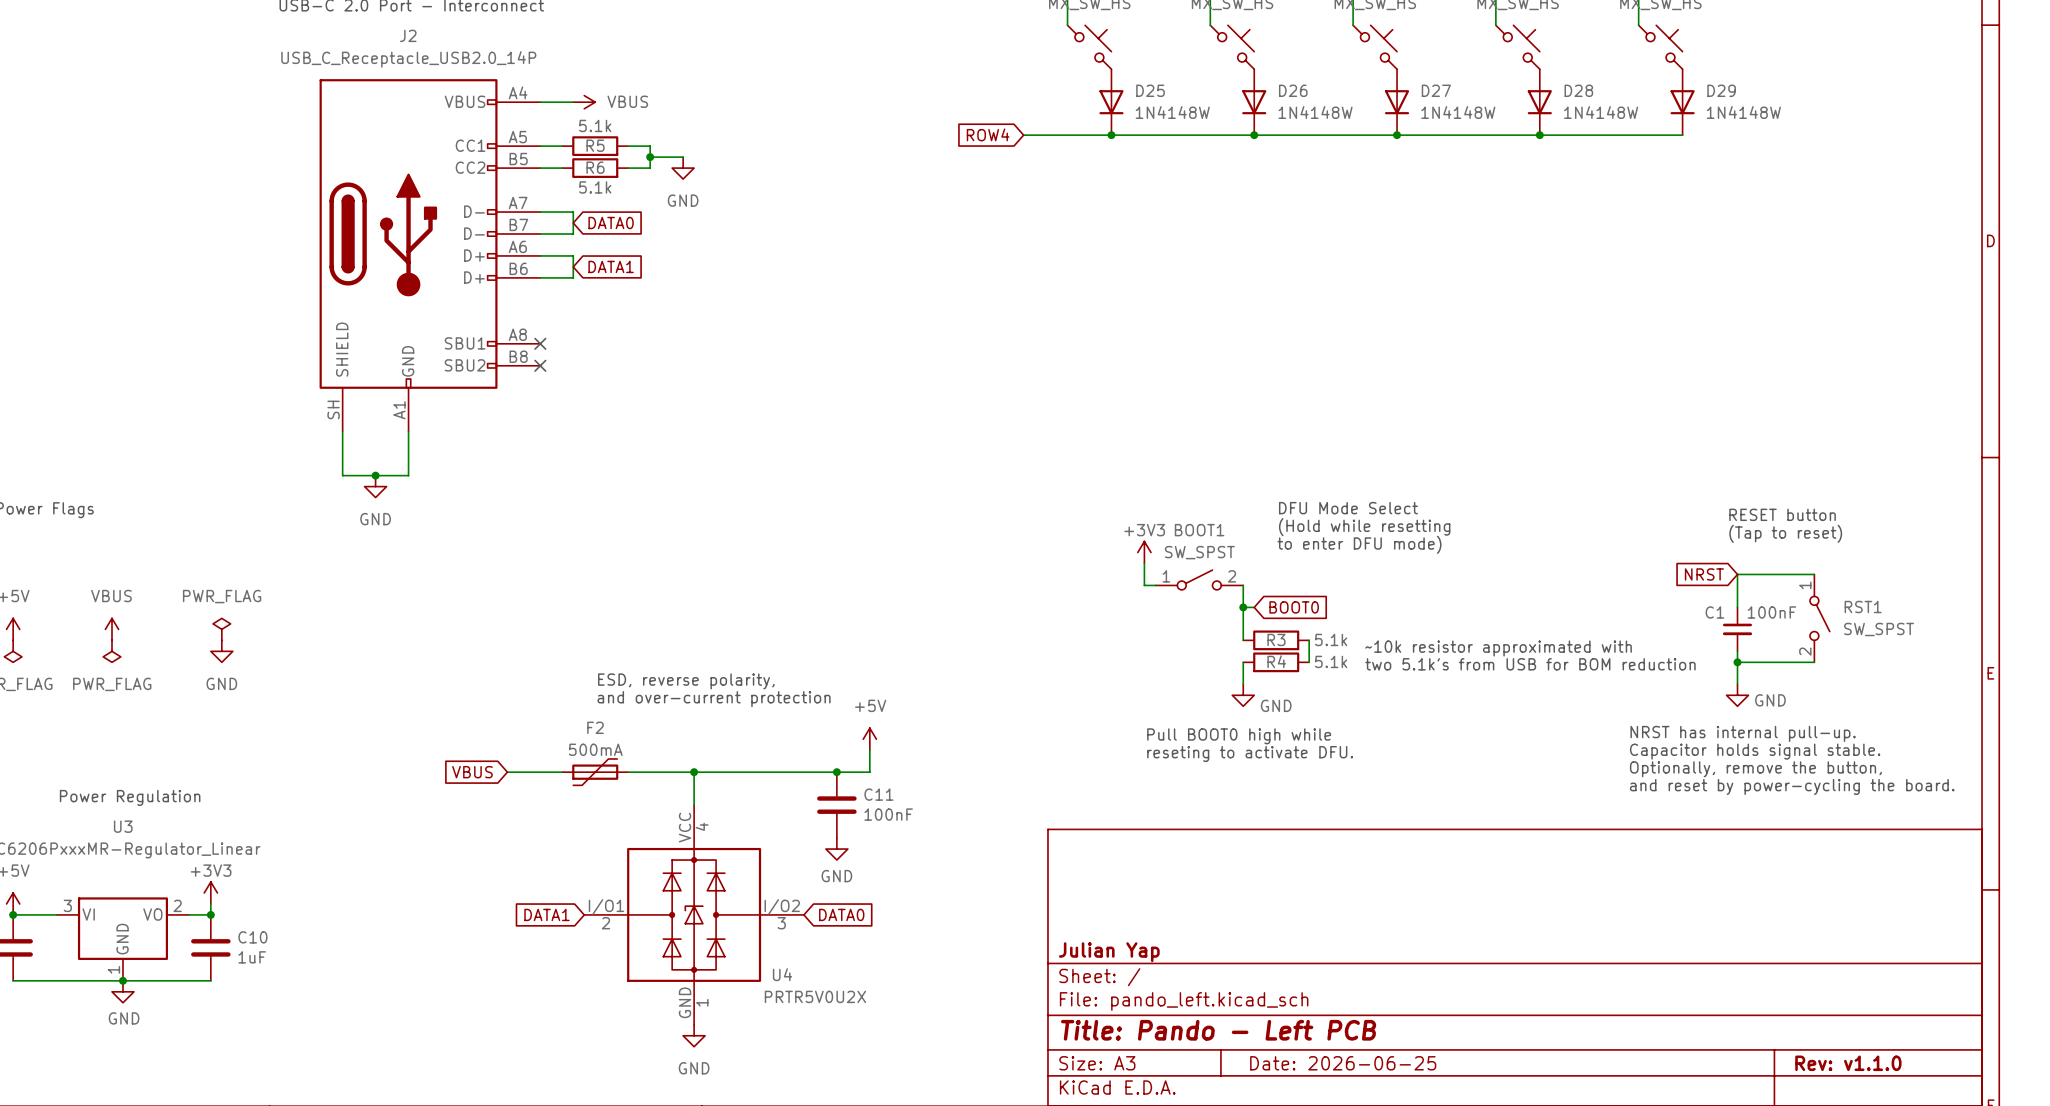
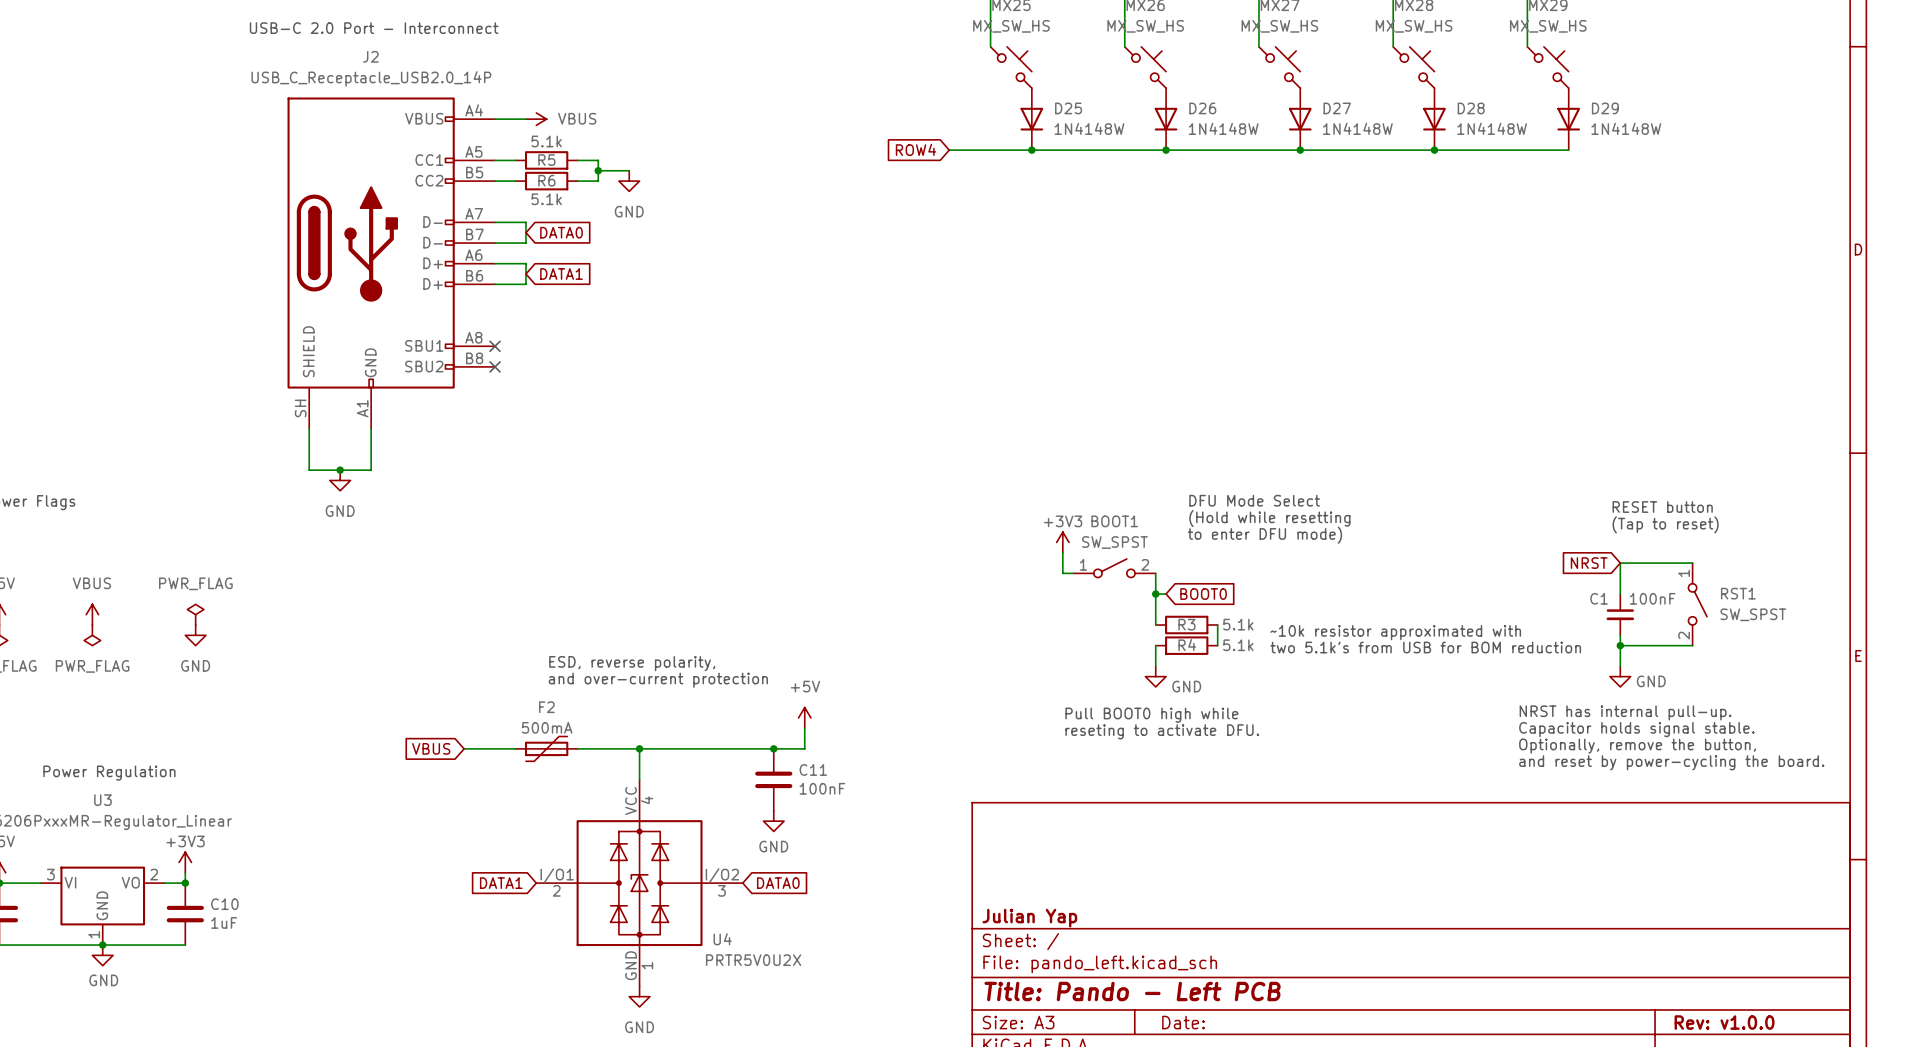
title block: Date: 2026-06-25 (1343, 1063) -> Date: (1183, 1022)
title block: Rev: v1.1.0 (1848, 1063) -> Rev: v1.0.0 (1724, 1022)

